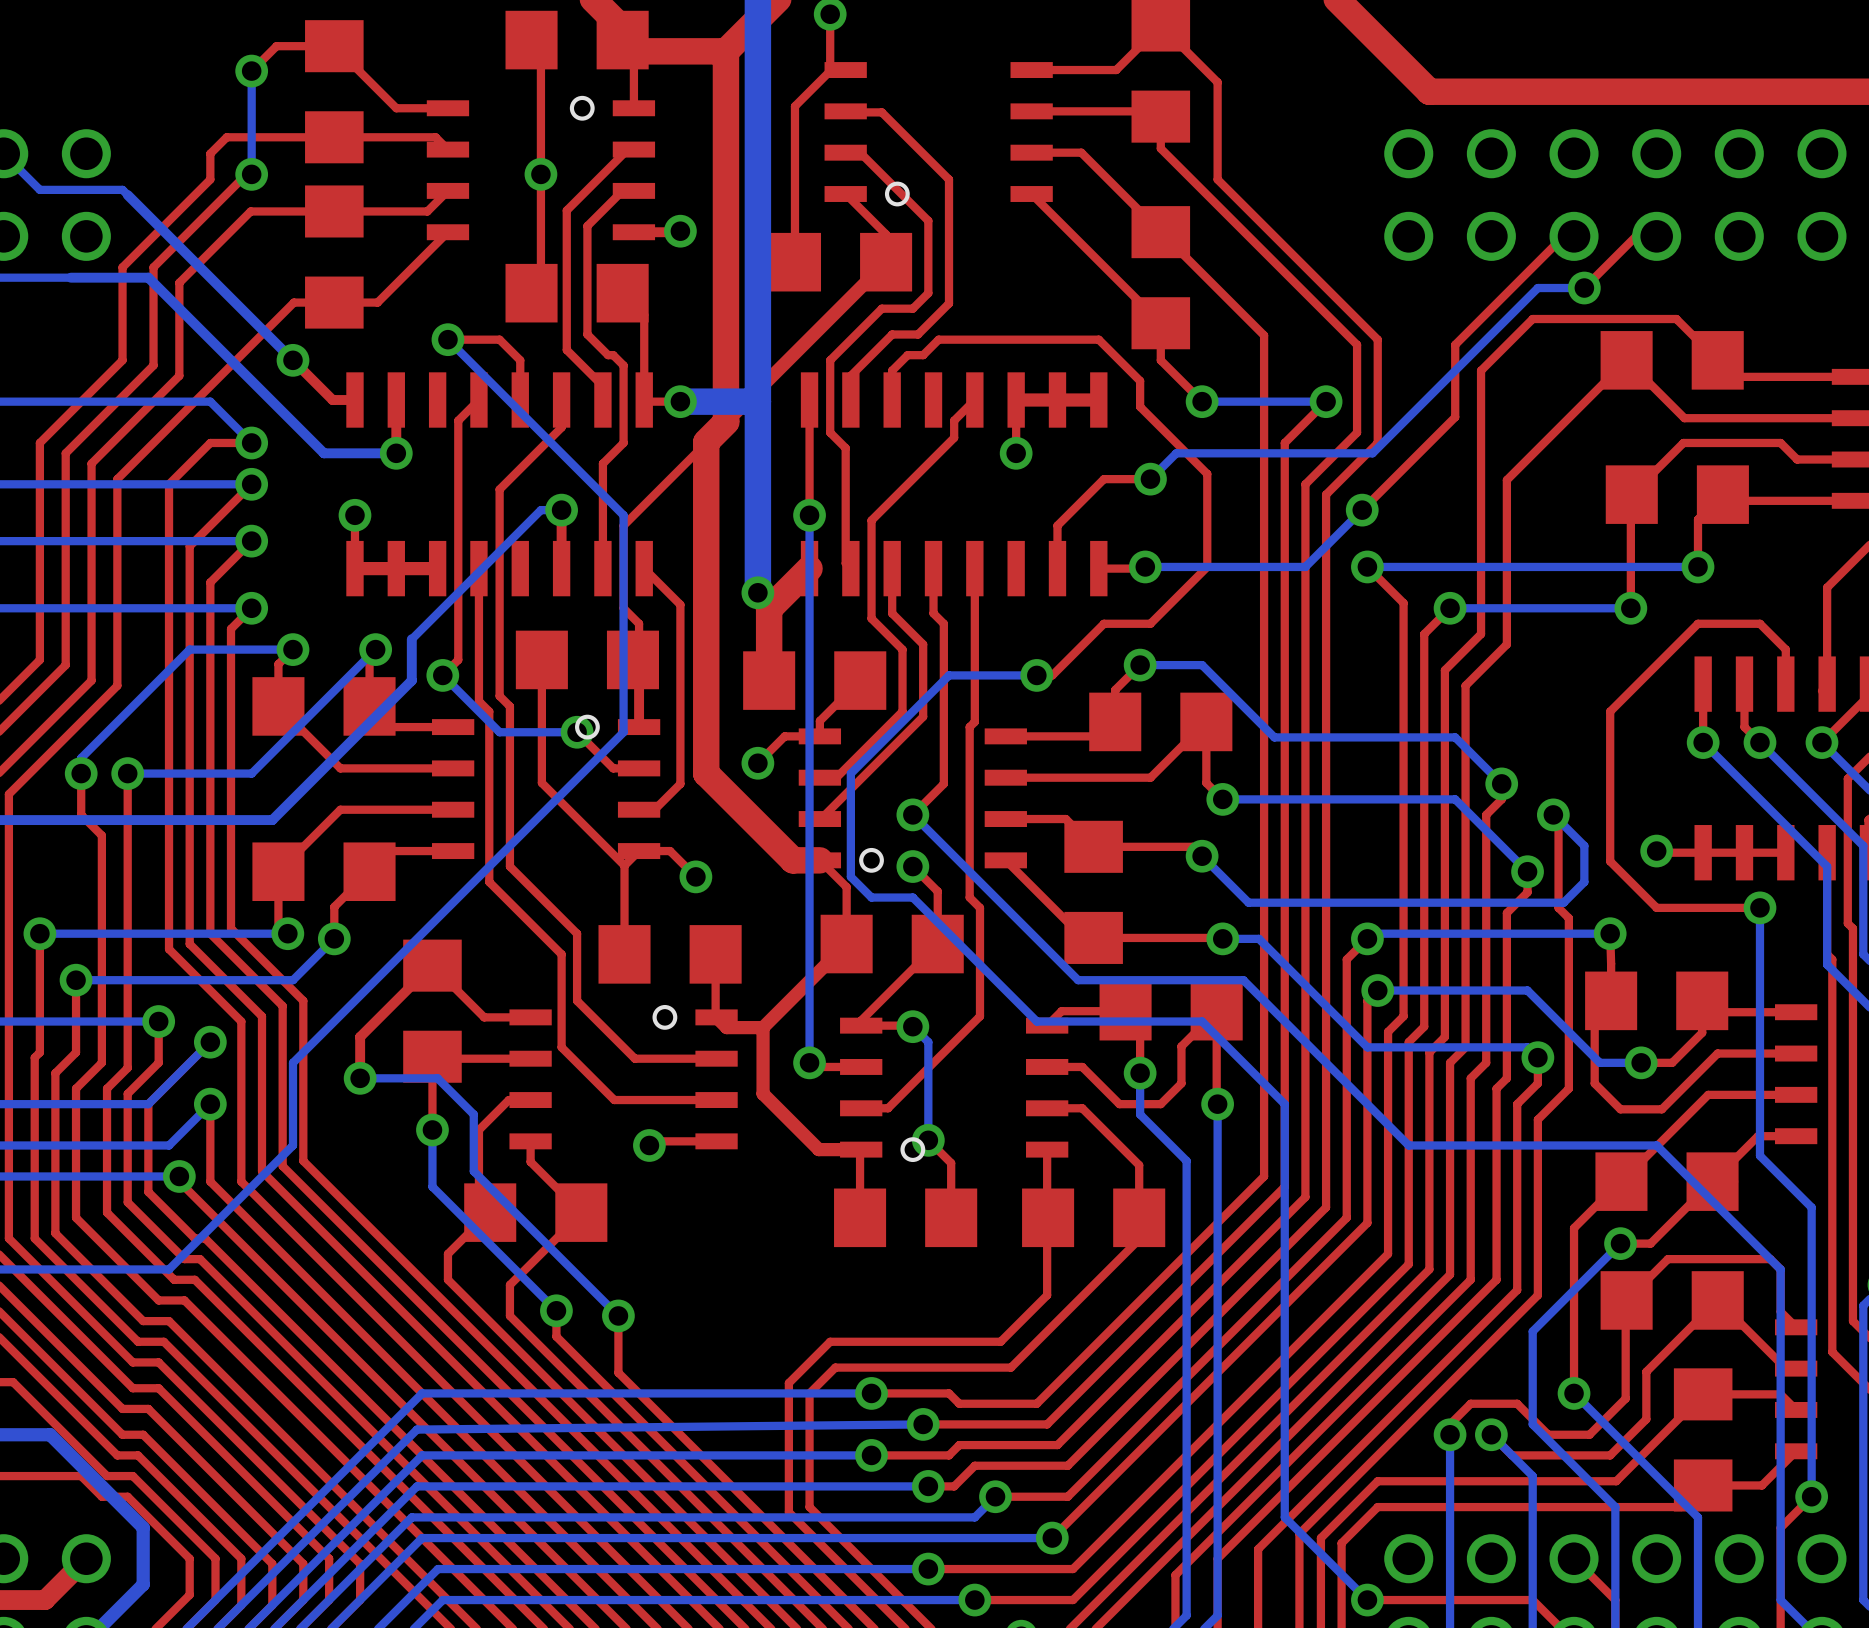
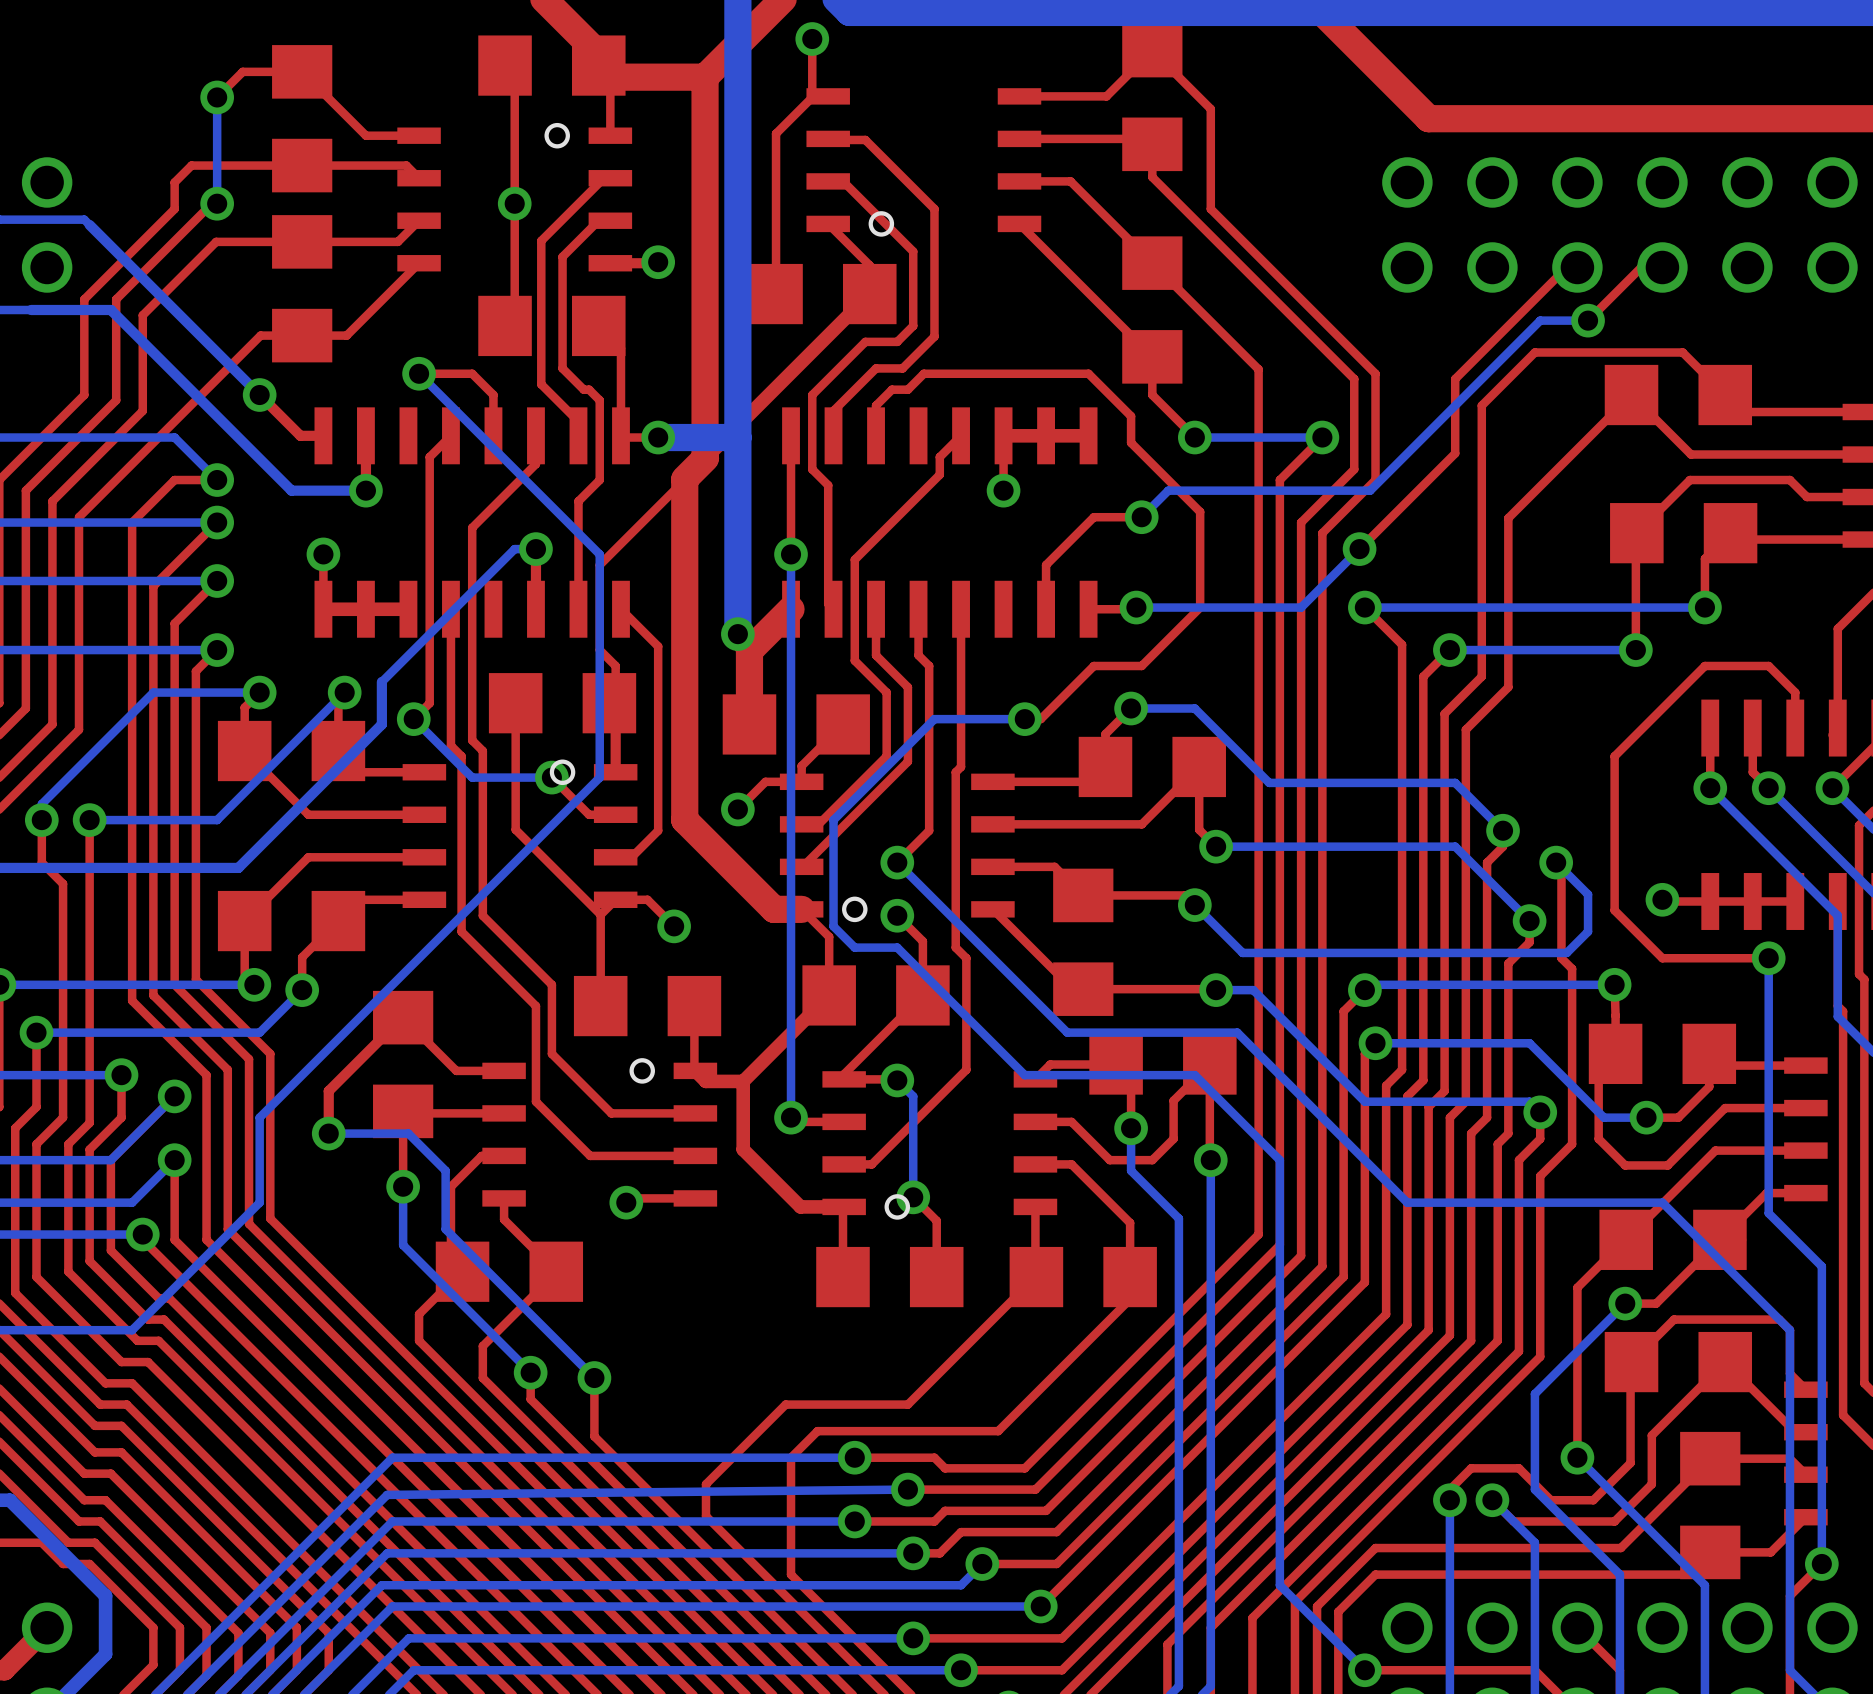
top track: (1047, 1218) (1047, 1295) (1000, 1341) (923, 1341) -> (1024, 1287) (907, 1404)
top track: (830, 1341) (788, 1383) (788, 1512) -> (812, 1404) (785, 1404) (706, 1484) (706, 1516) (769, 1579)

